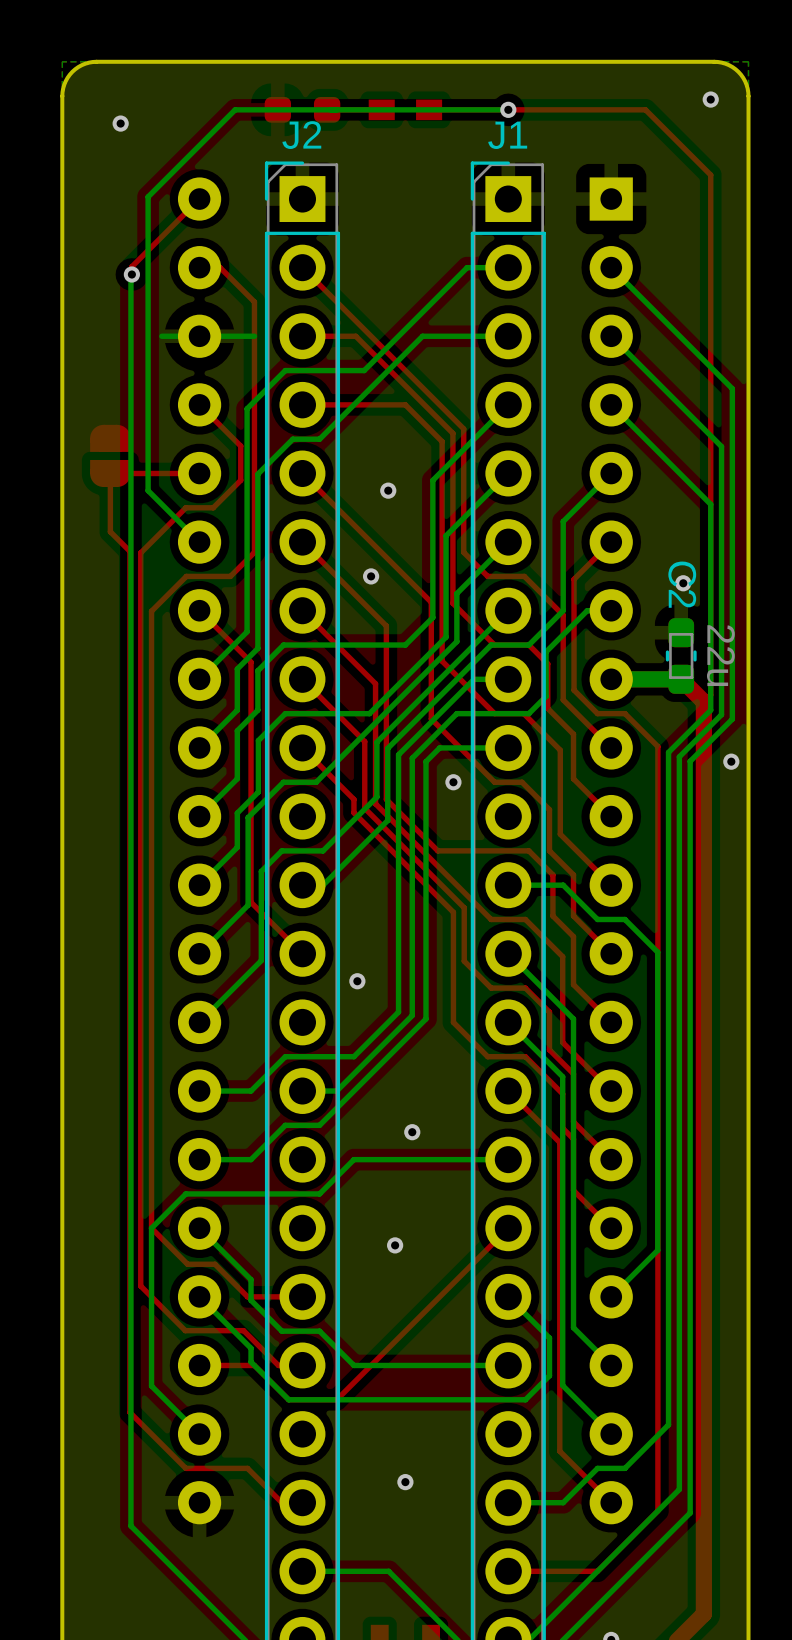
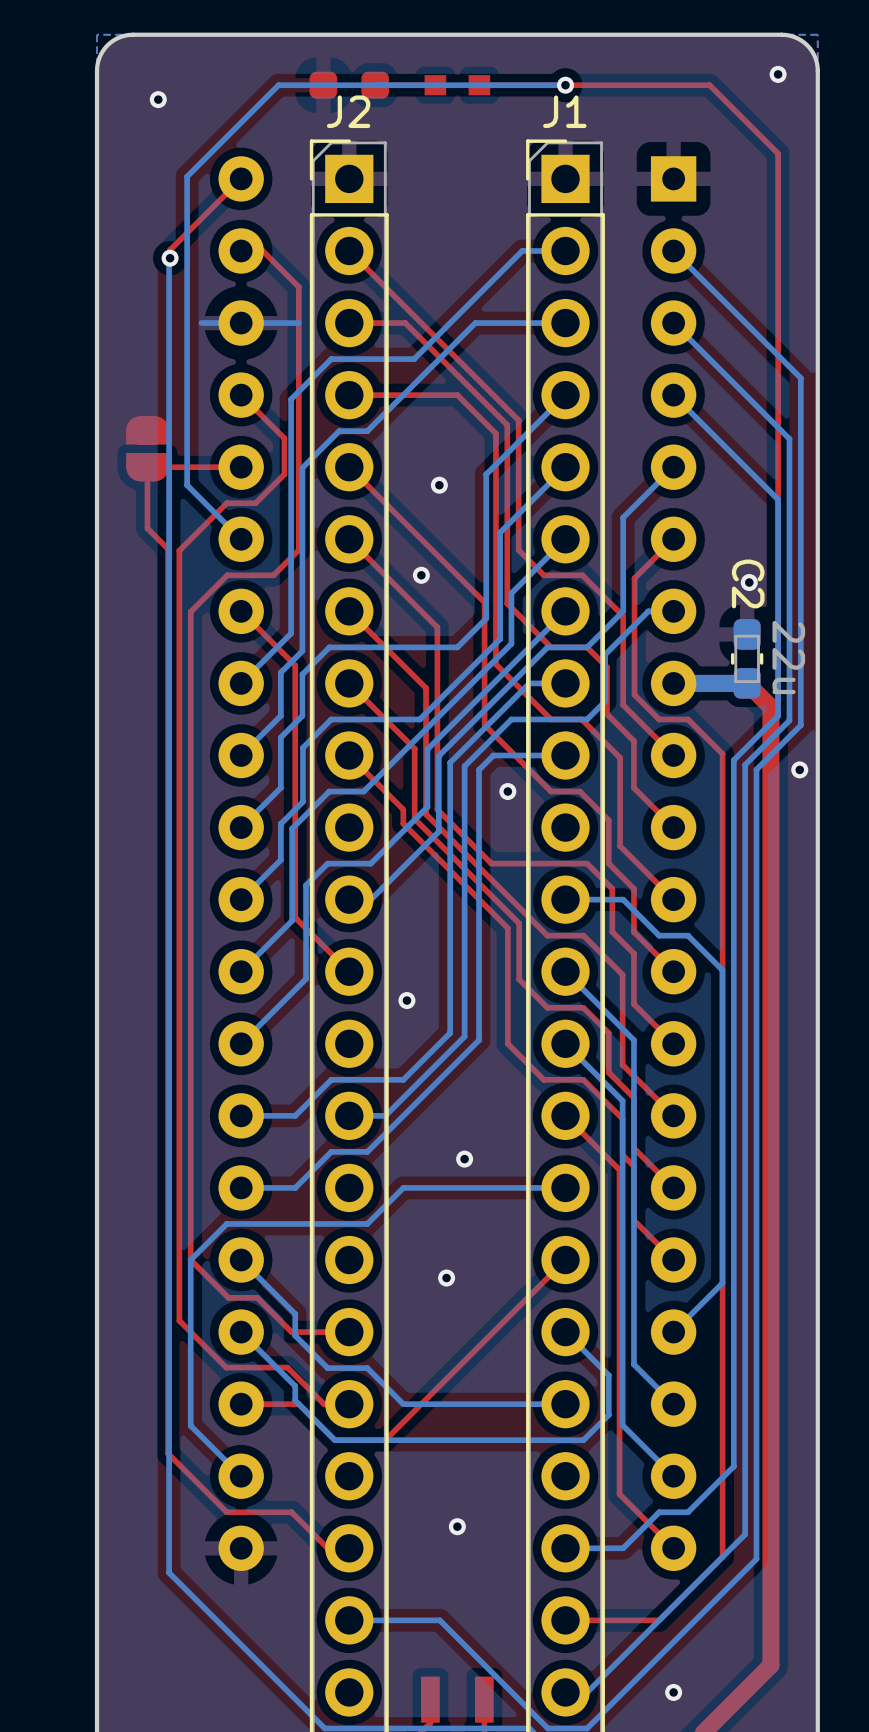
part footprint: [368, 99, 443, 121] -> [424, 75, 491, 96]

